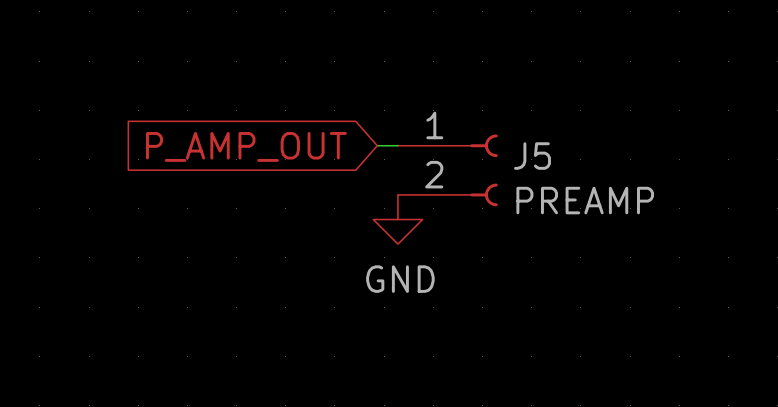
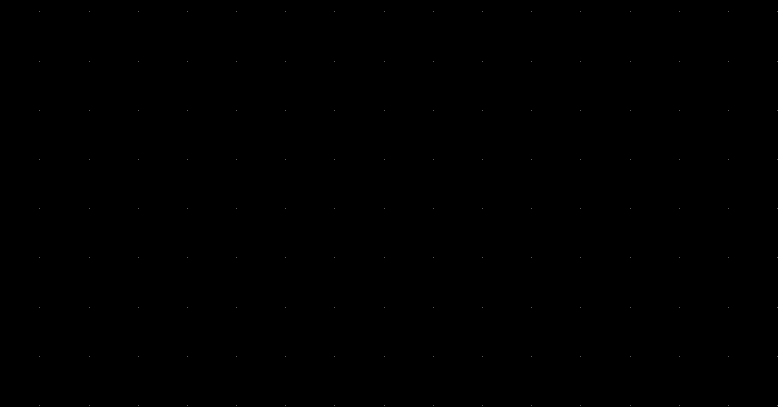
wire: (377, 145) (397, 145) -> none
global label: P_AMP_OUT (246, 146) -> none
J5: PREAMP (447, 170) -> none
power symbol: GND (397, 219) -> none

